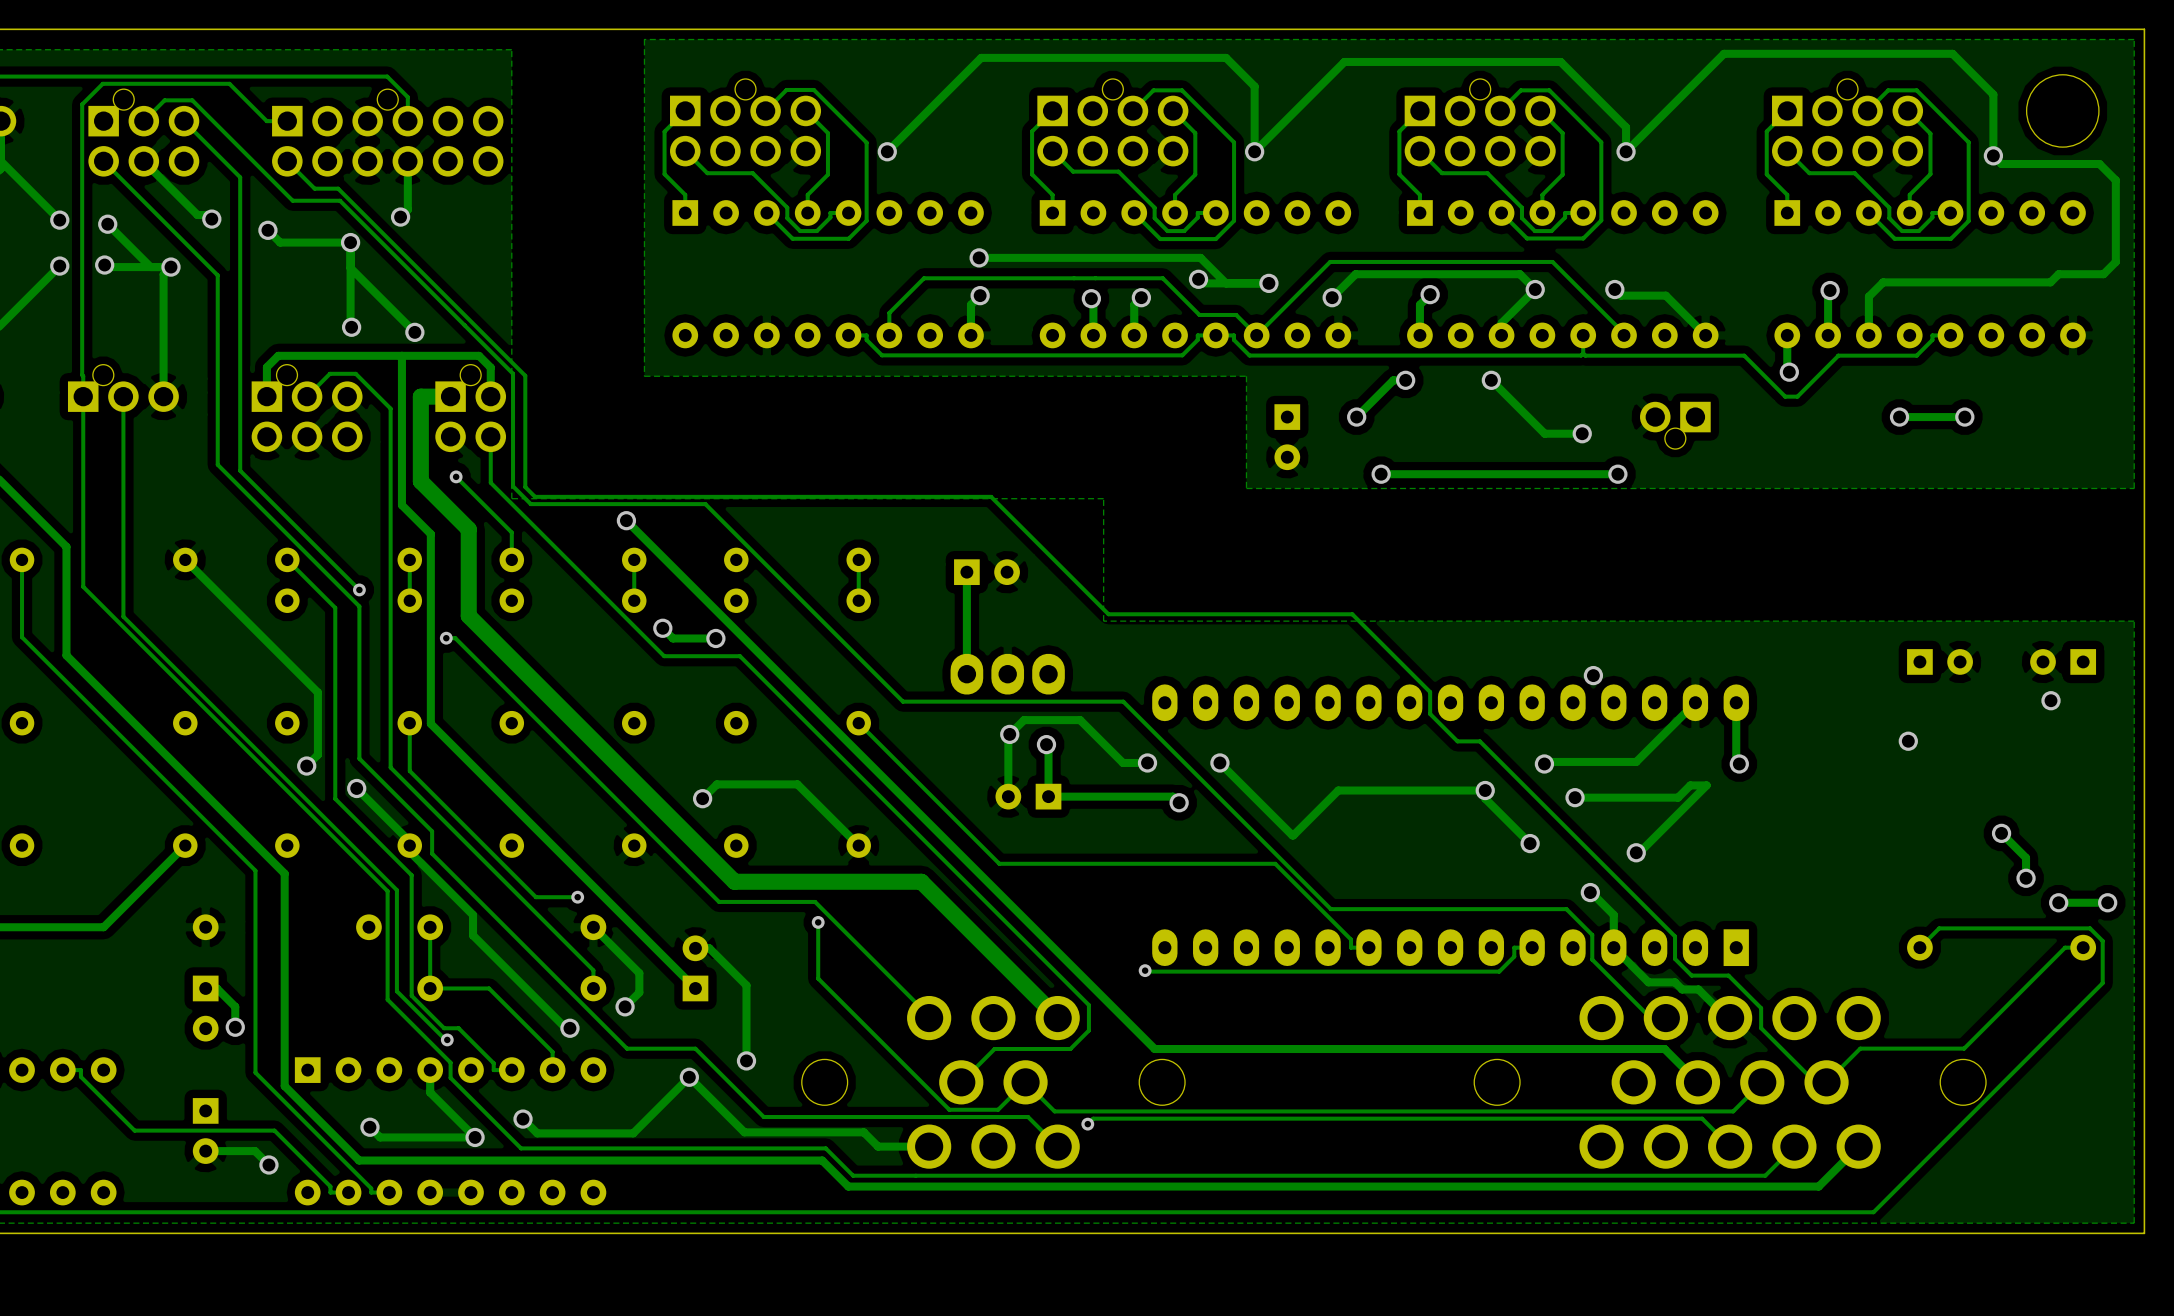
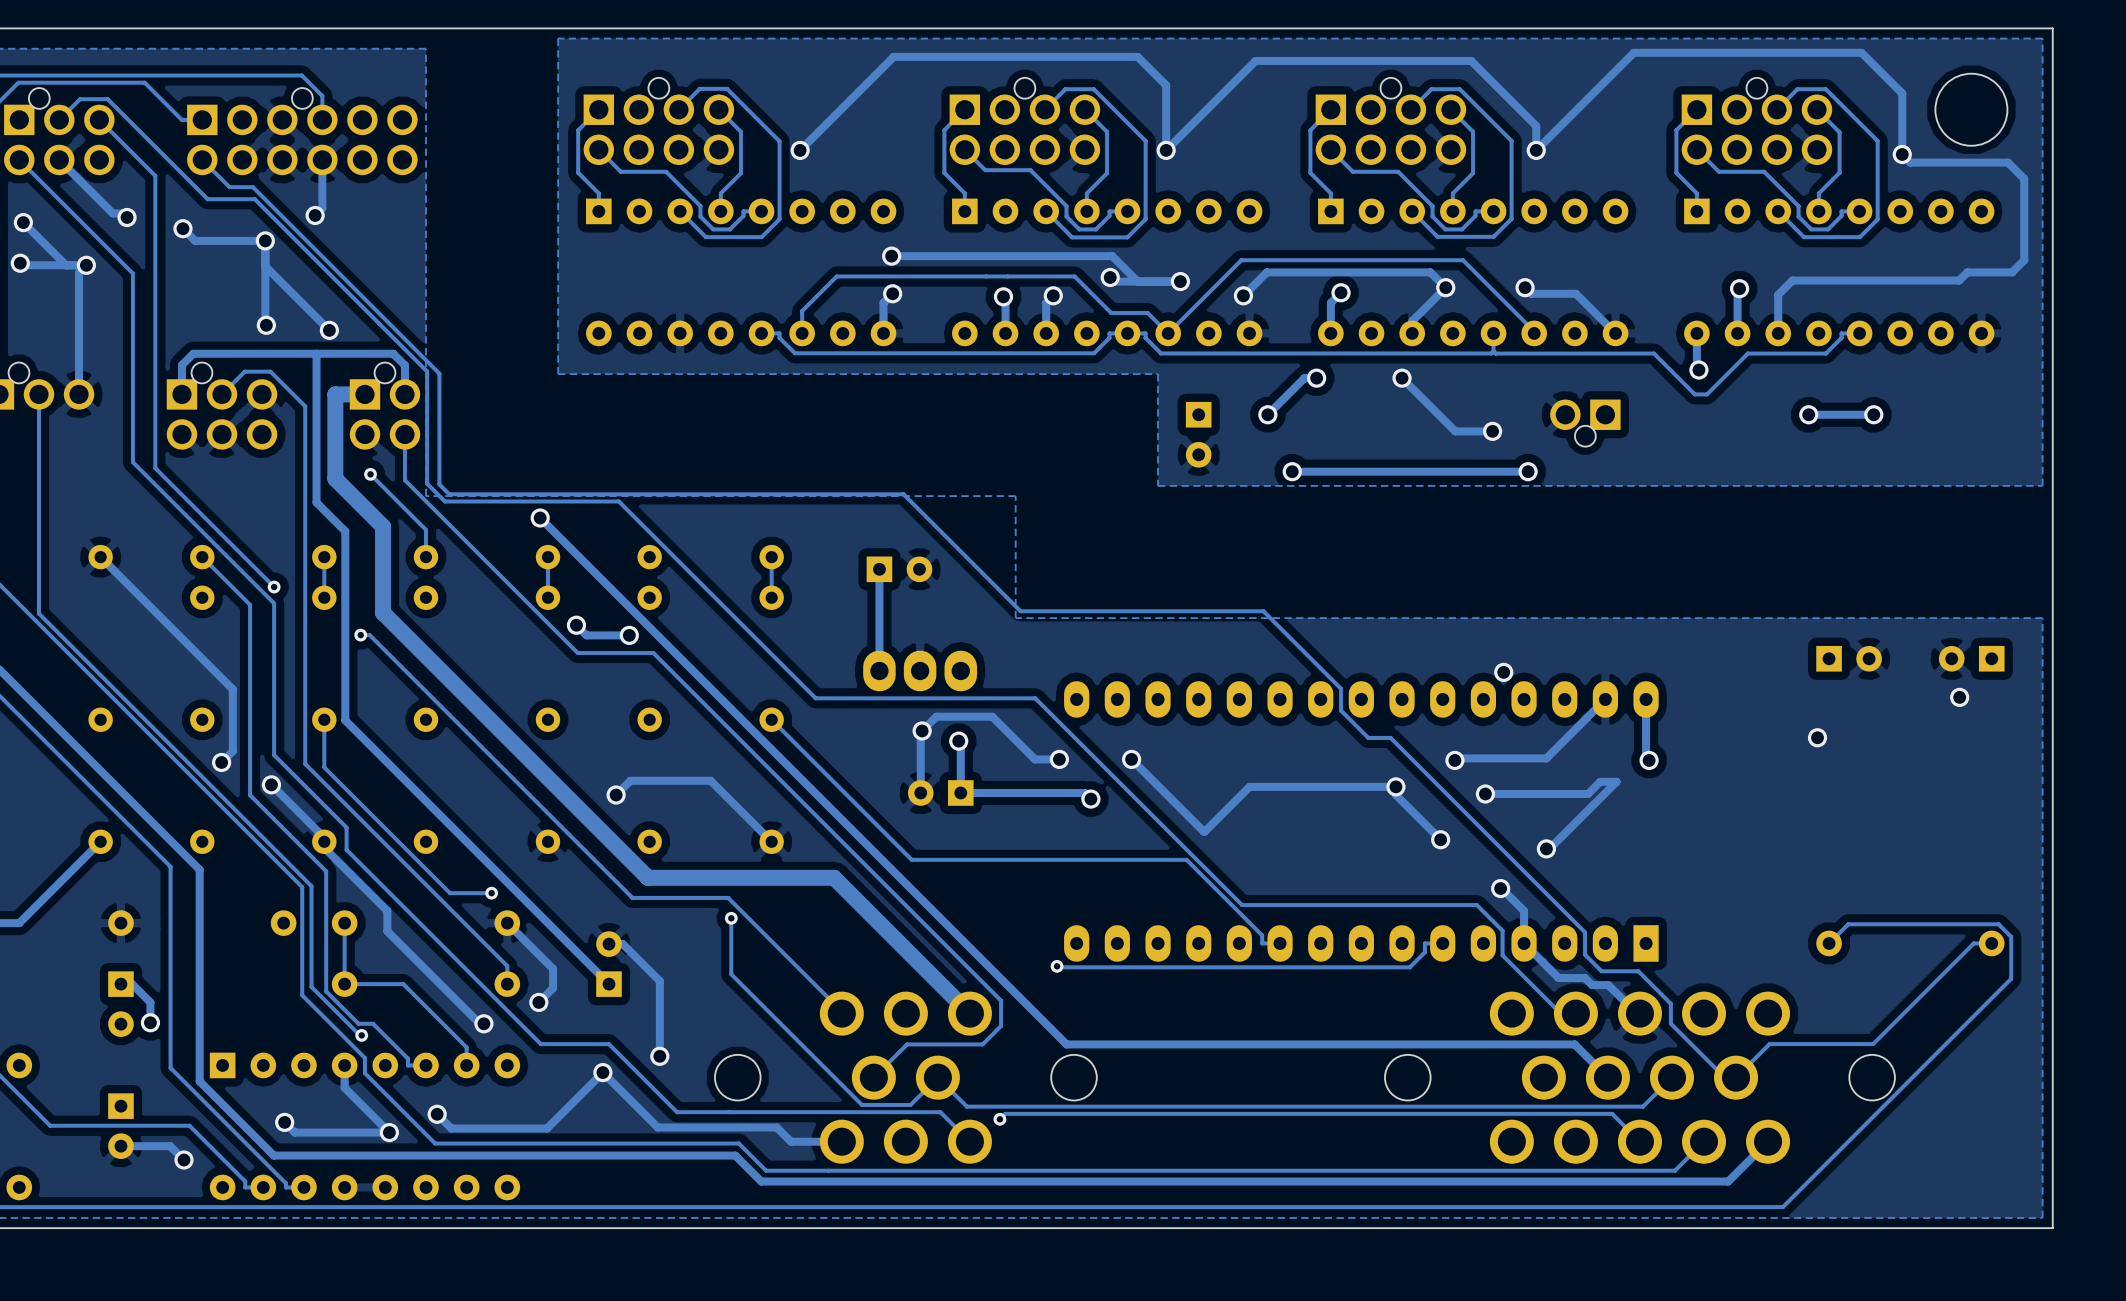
track: (2001, 833) (2026, 857) (2026, 878) -> none
via: (2001, 833) -> none
via: (2026, 878) -> none
via: (2058, 902) -> none
track: (2107, 902) (2058, 902) -> none
via: (2107, 902) -> none

